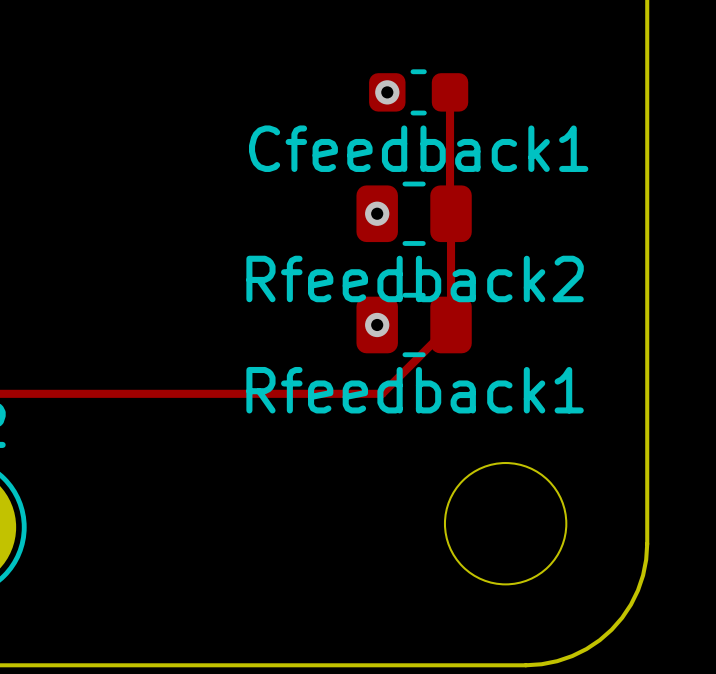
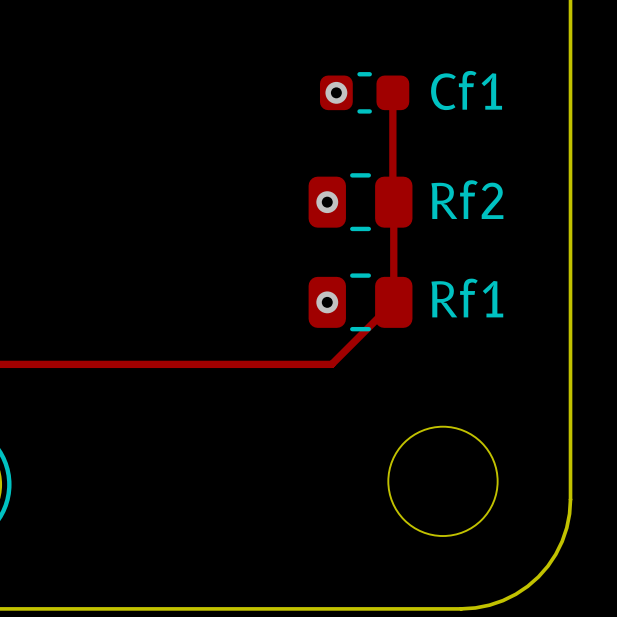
Cfeedback1 name: Cfeedback1 (418, 148) -> Cf1 (466, 90)
Rfeedback2 name: Rfeedback2 (415, 278) -> Rf2 (467, 199)
Rfeedback1 name: Rfeedback1 (415, 390) -> Rf1 (467, 298)

